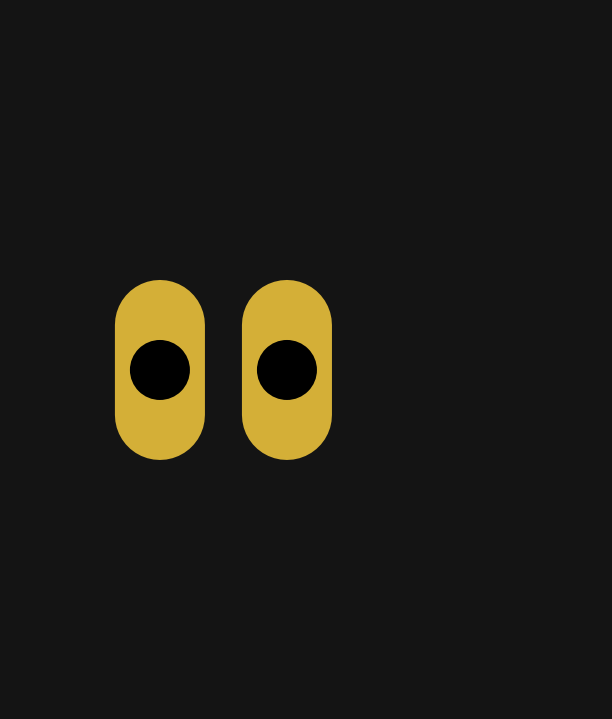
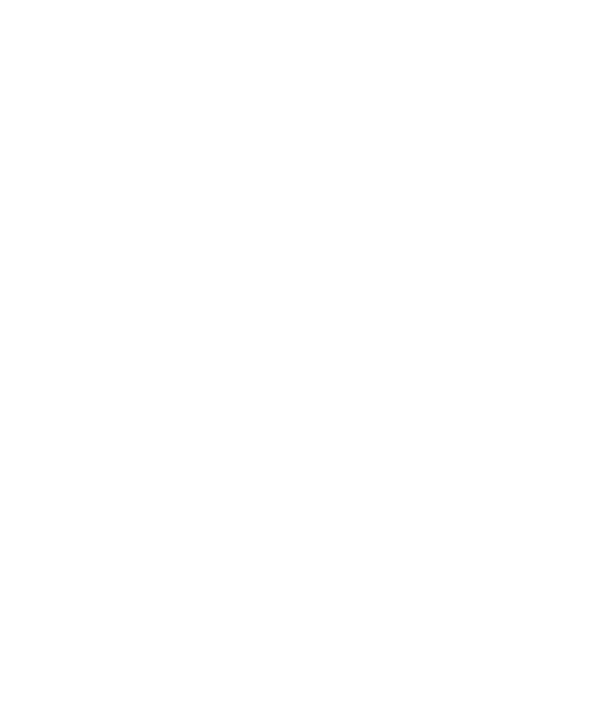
part: (223, 369) -> none

